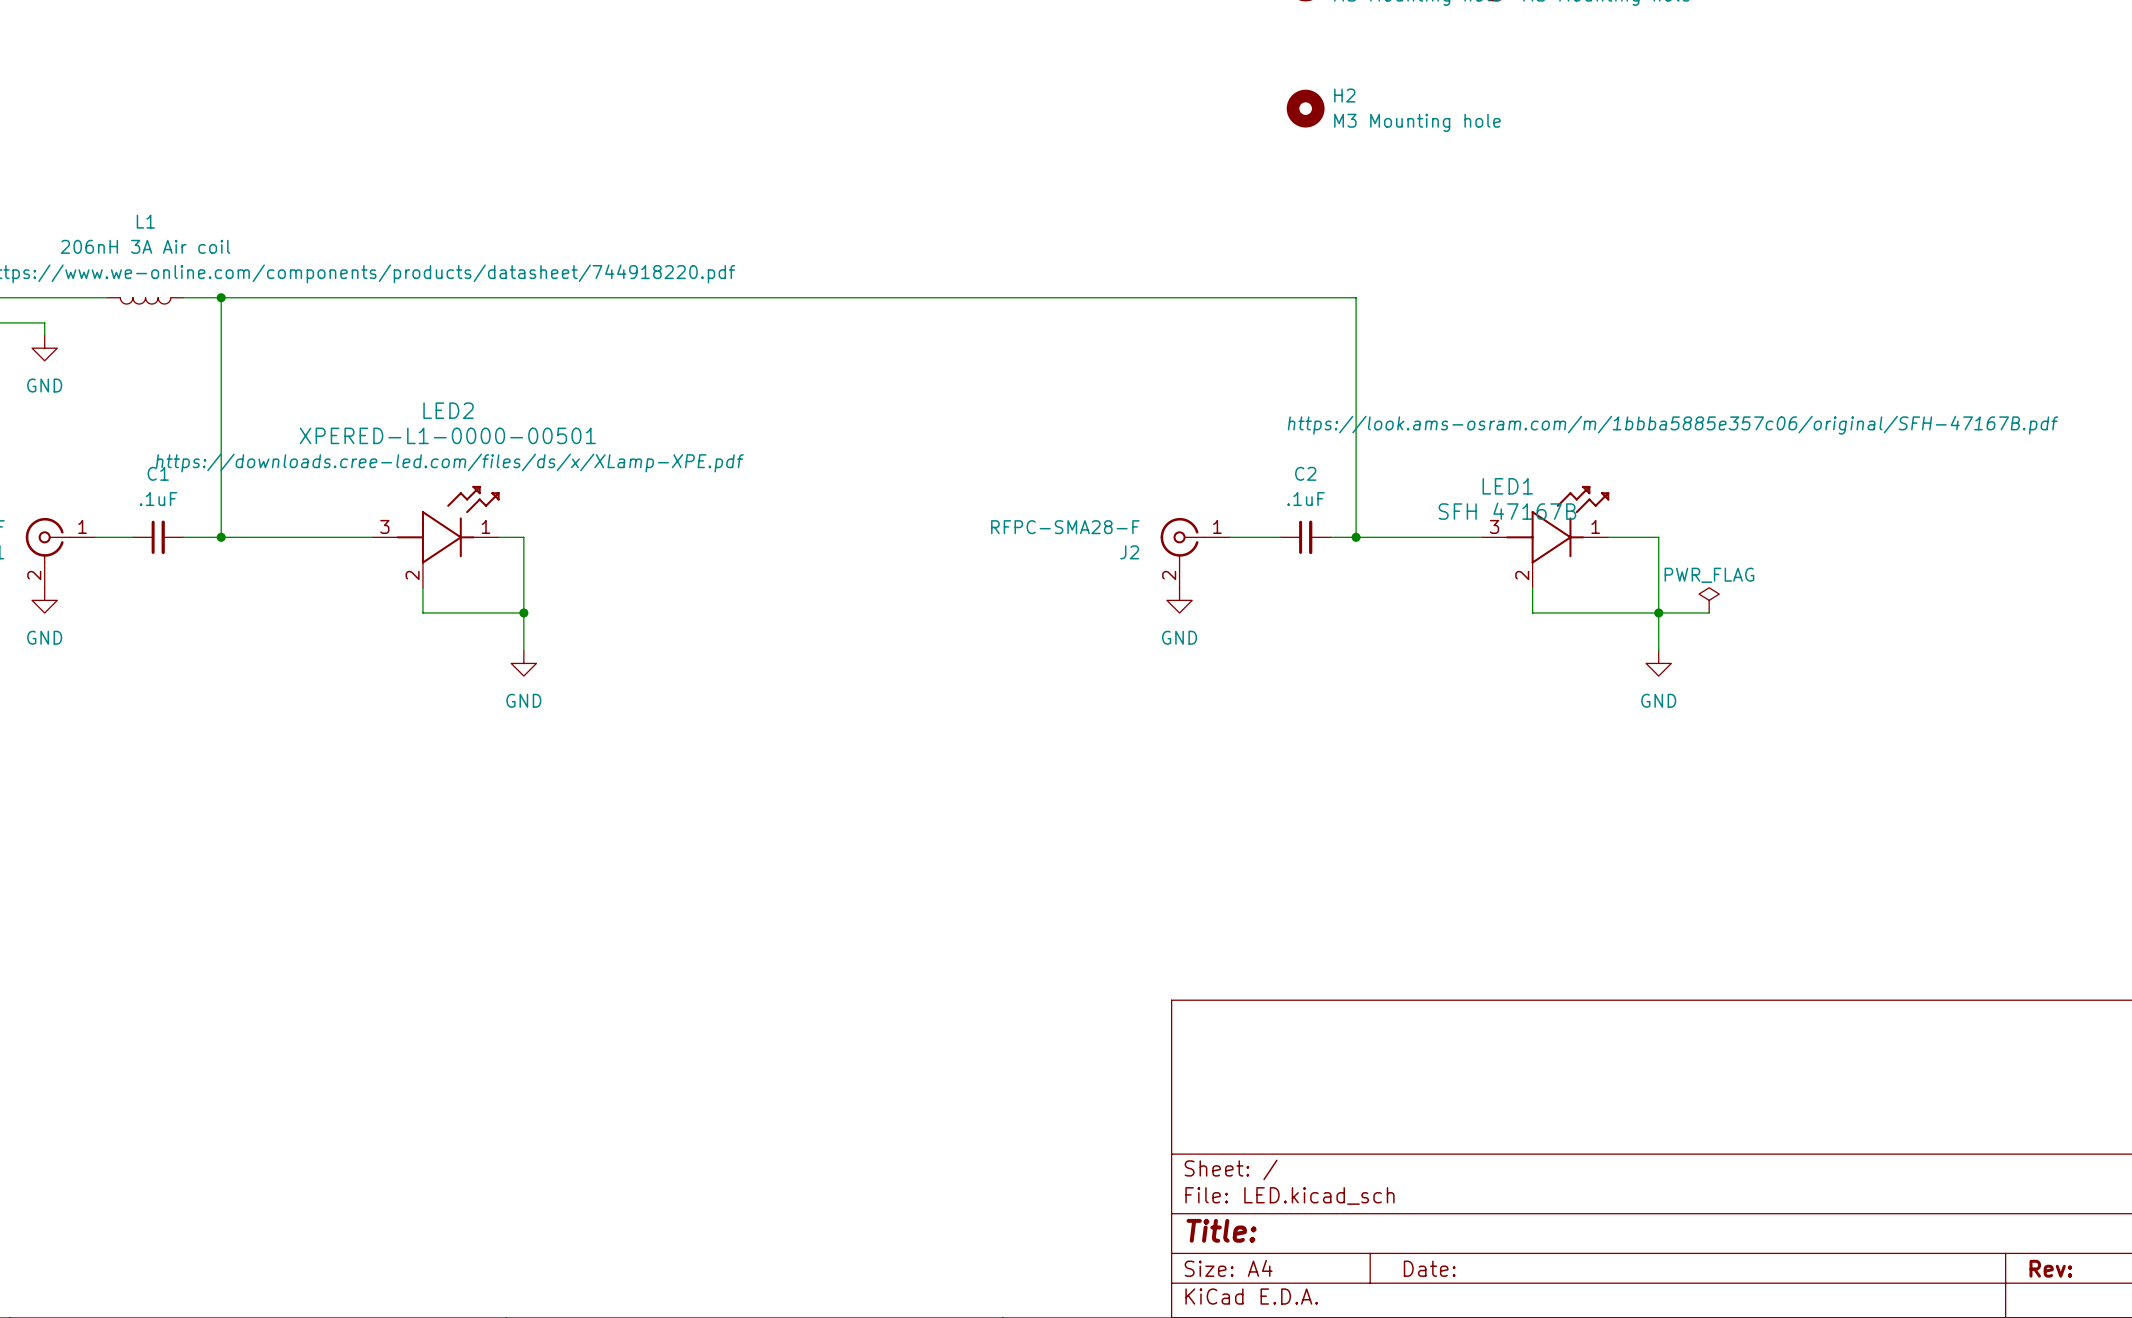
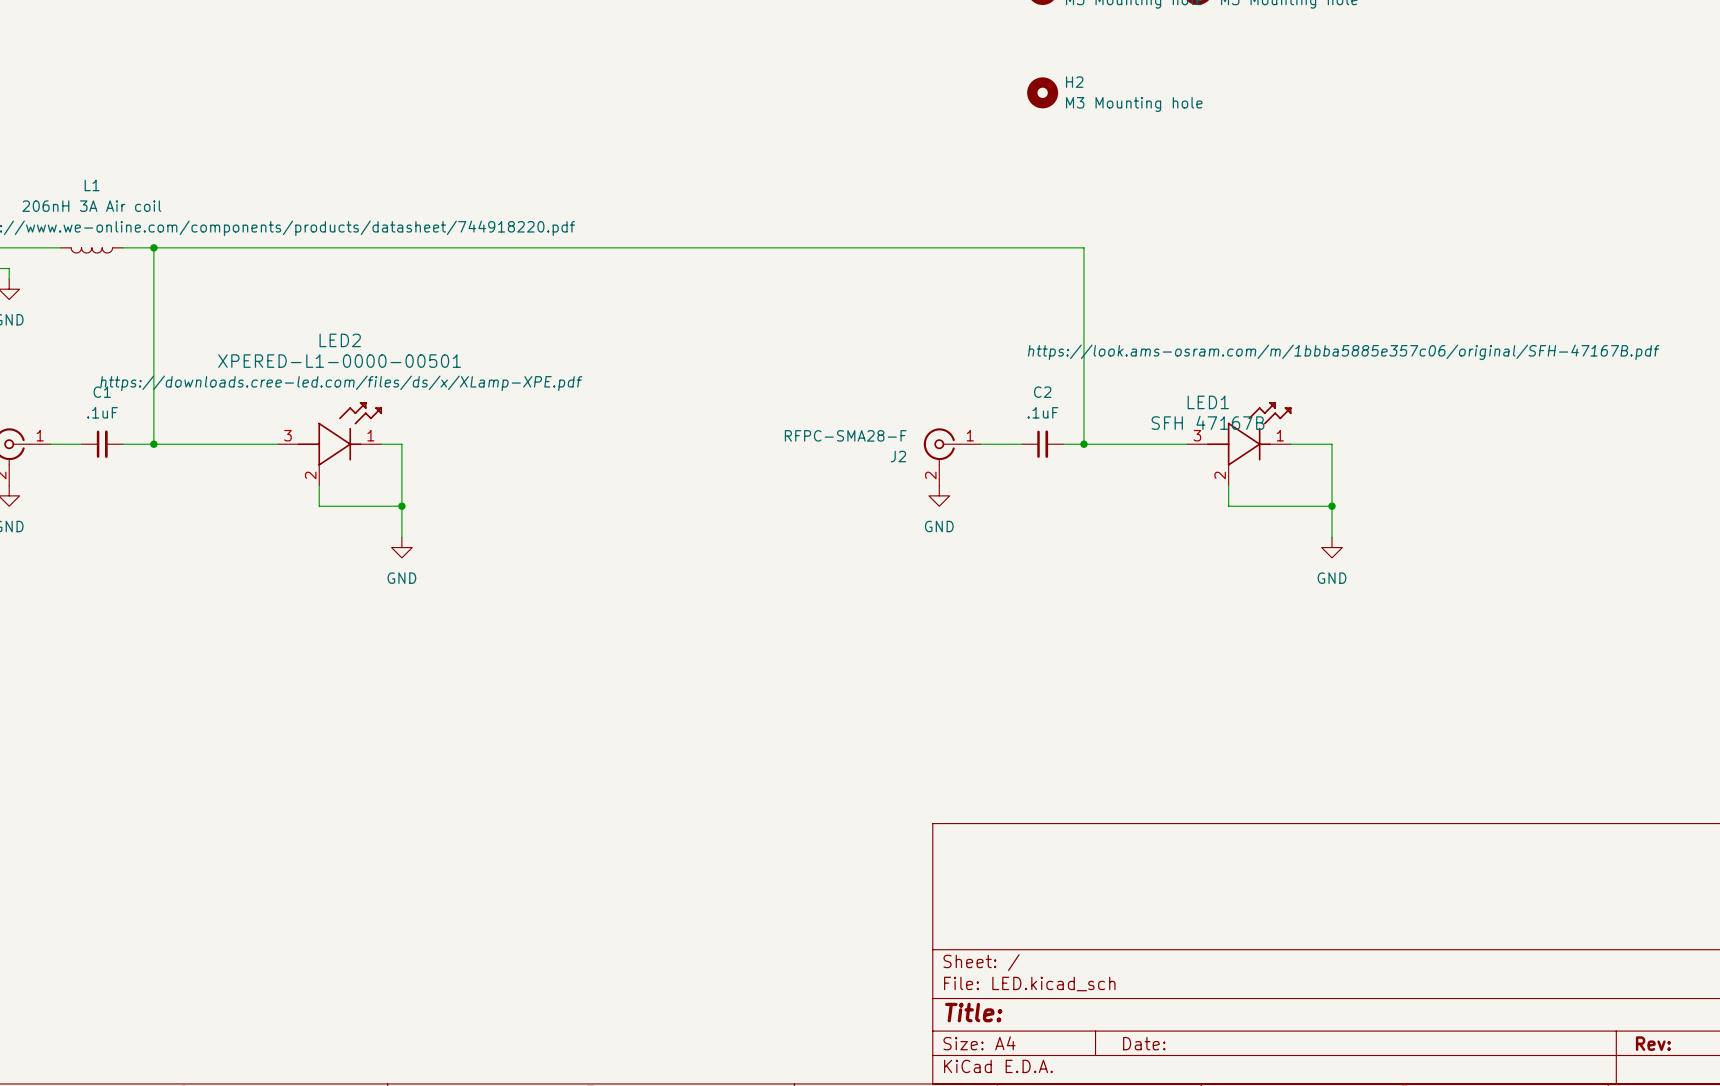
power symbol: PWR_FLAG (1709, 600) -> none
wire: (1658, 612) (1709, 612) -> none

